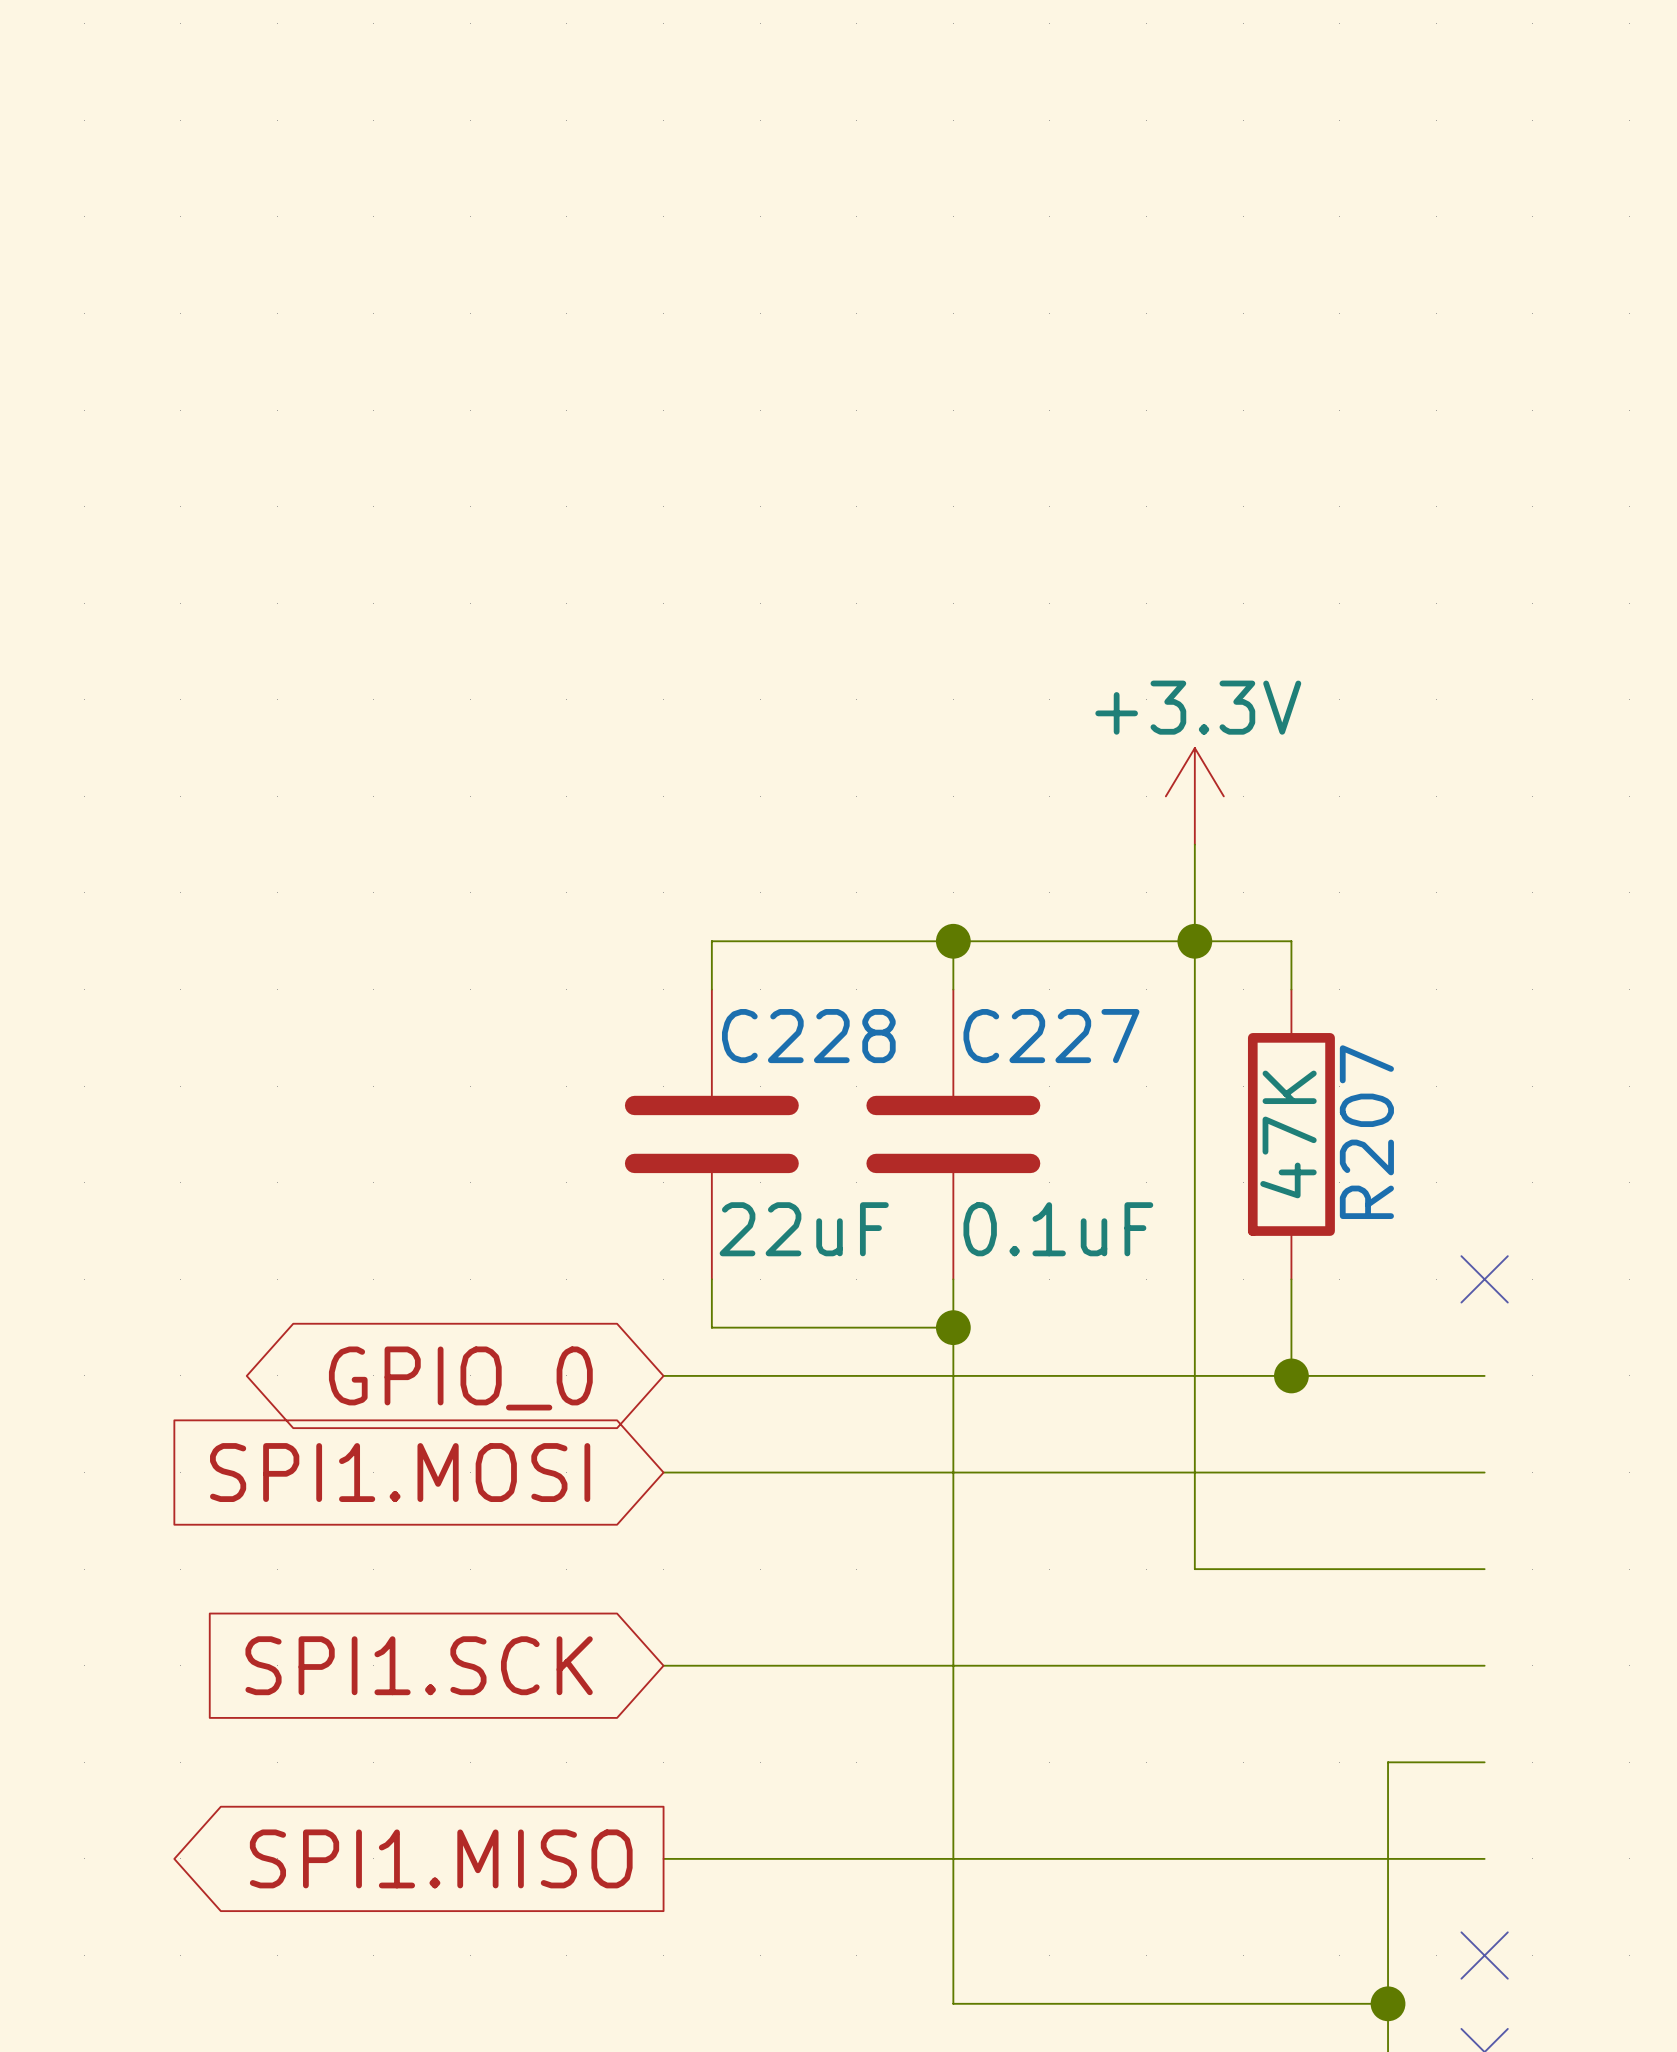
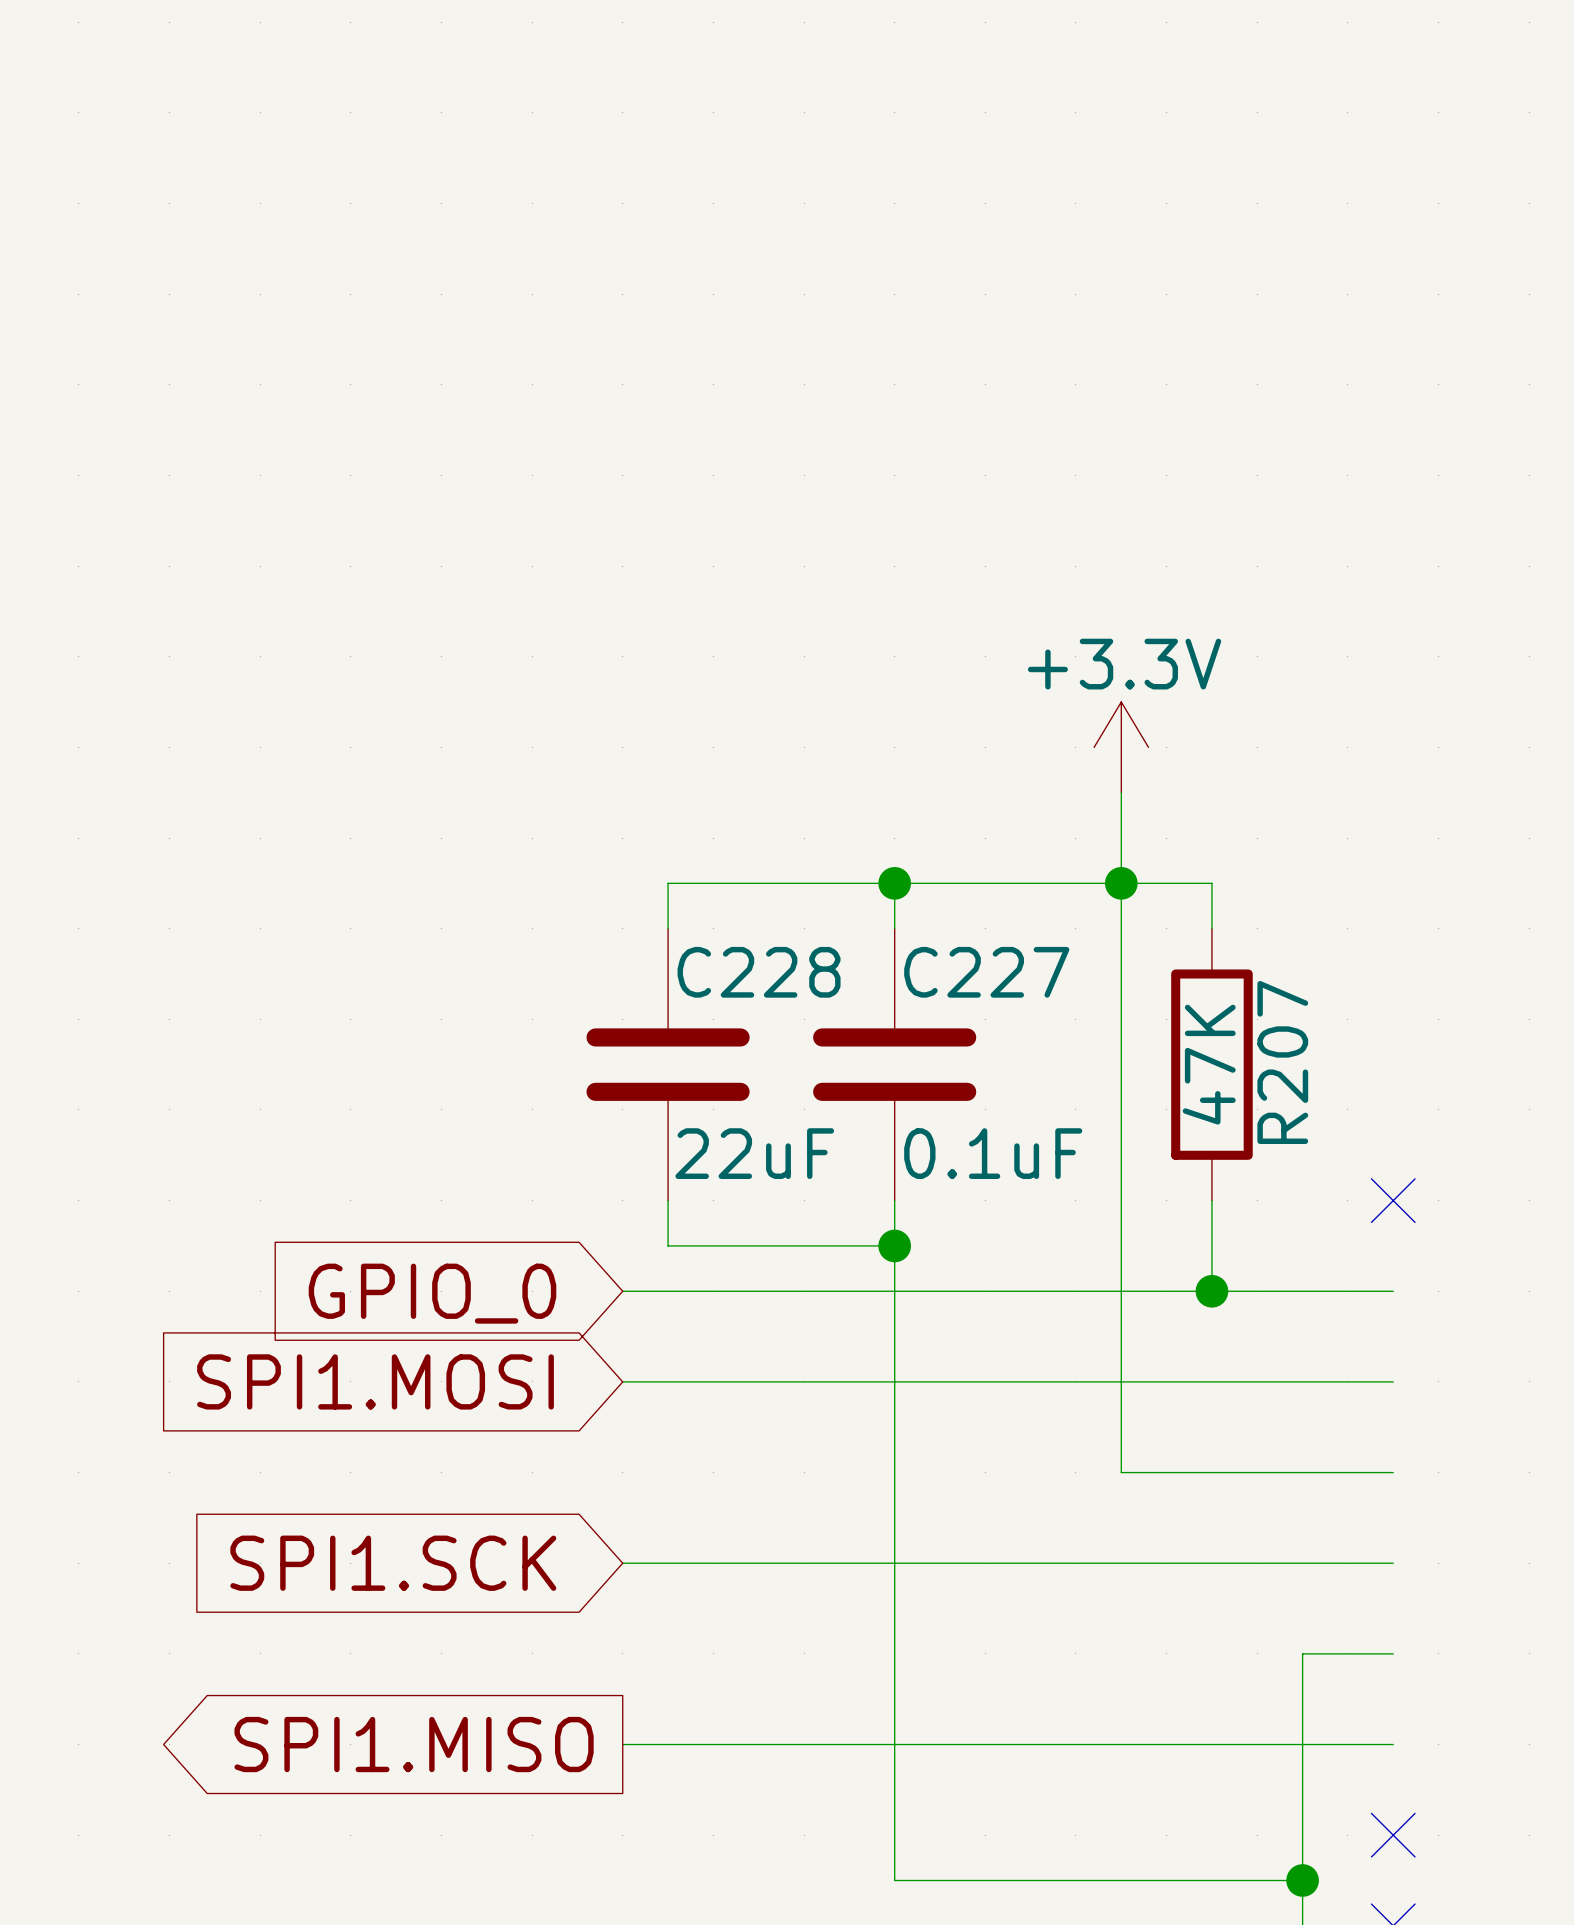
global label shape: bidirectional (460, 1378) -> input (432, 1293)

